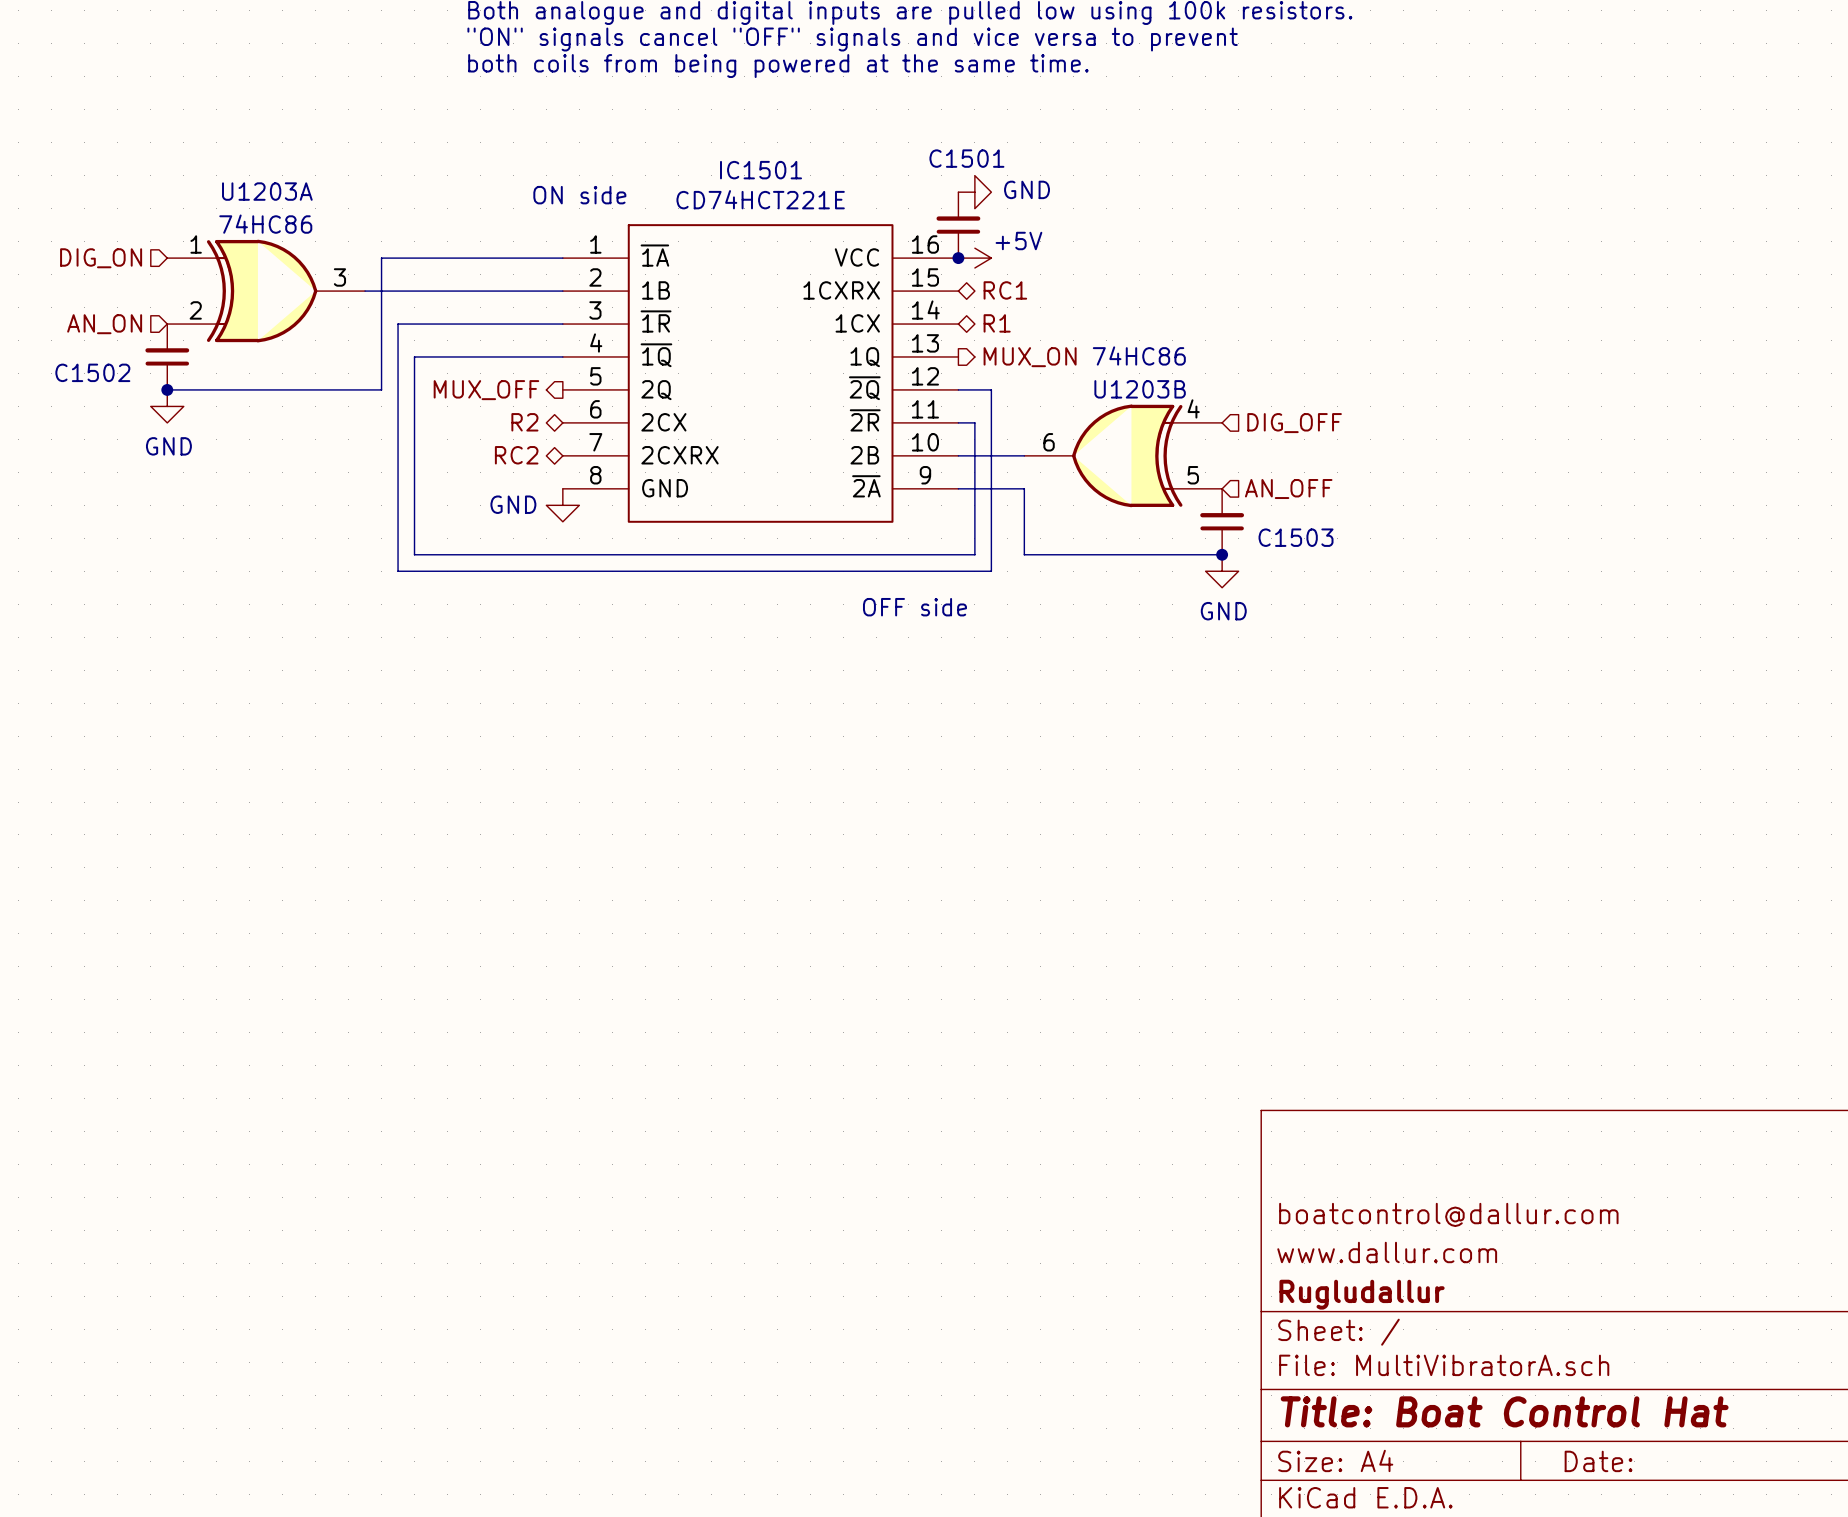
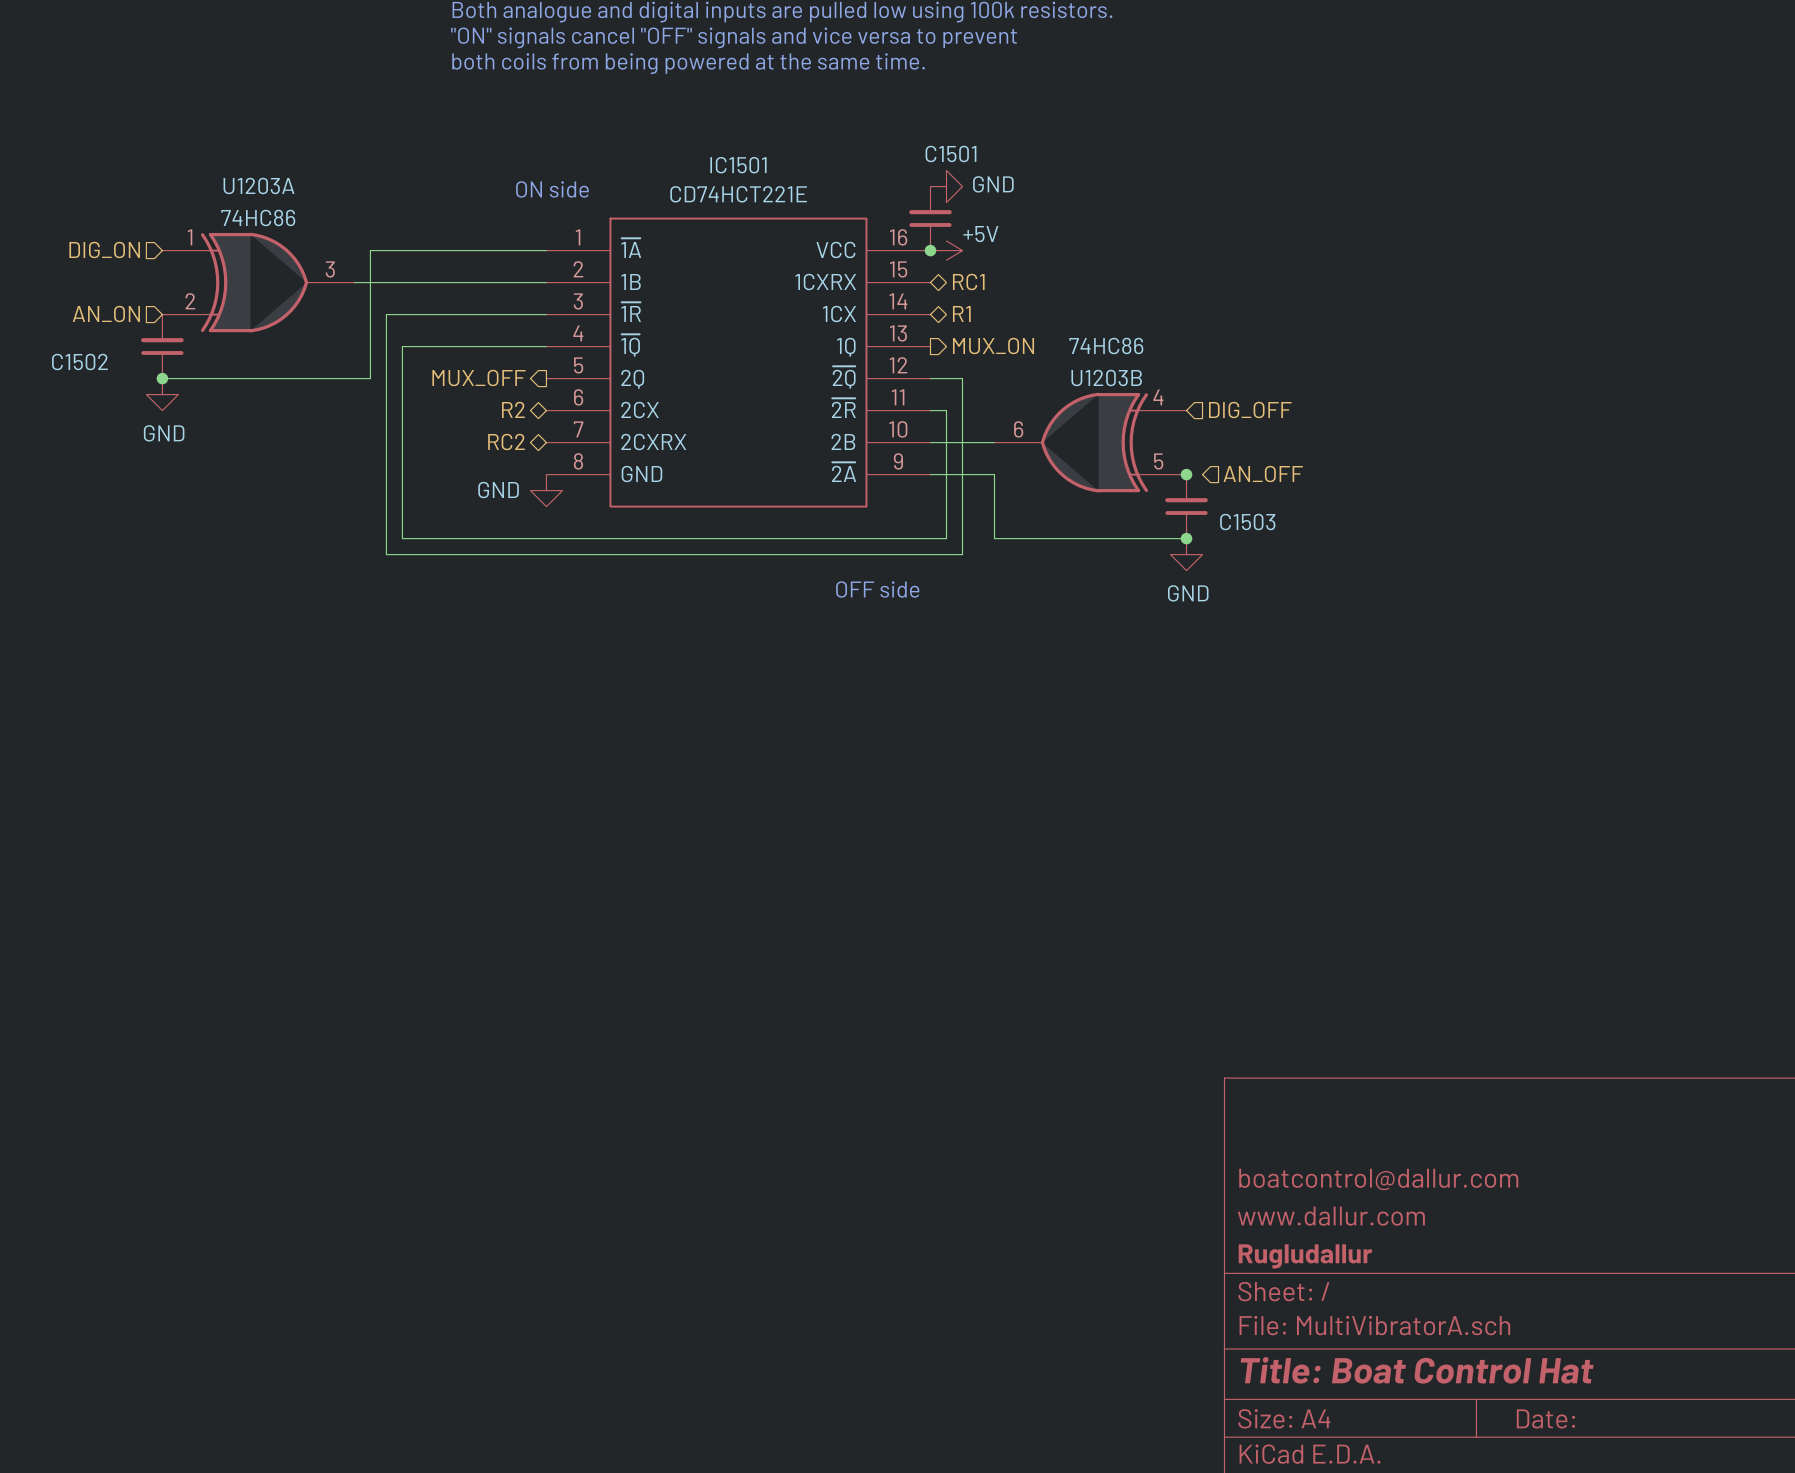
junction: none -> (1186, 474)
hierarchical label position: AN_OFF (1288, 489) -> AN_OFF (1263, 474)

